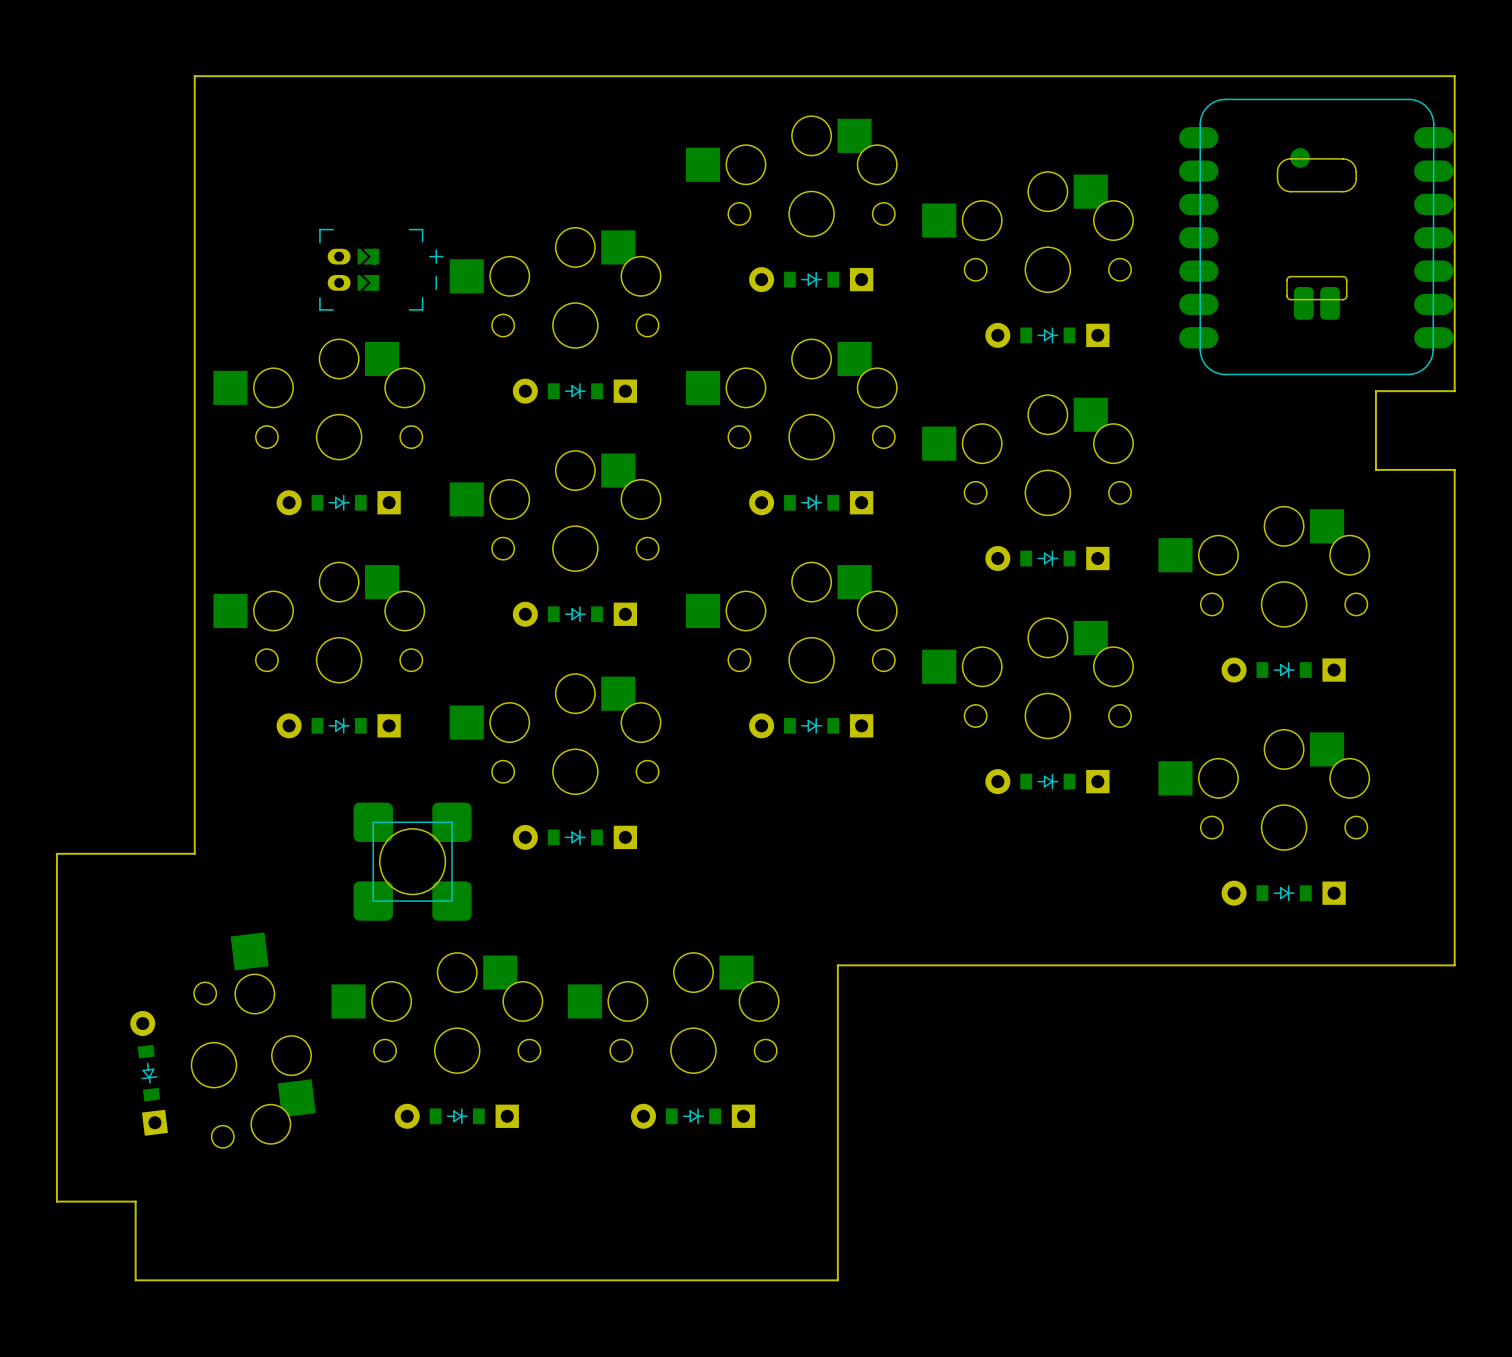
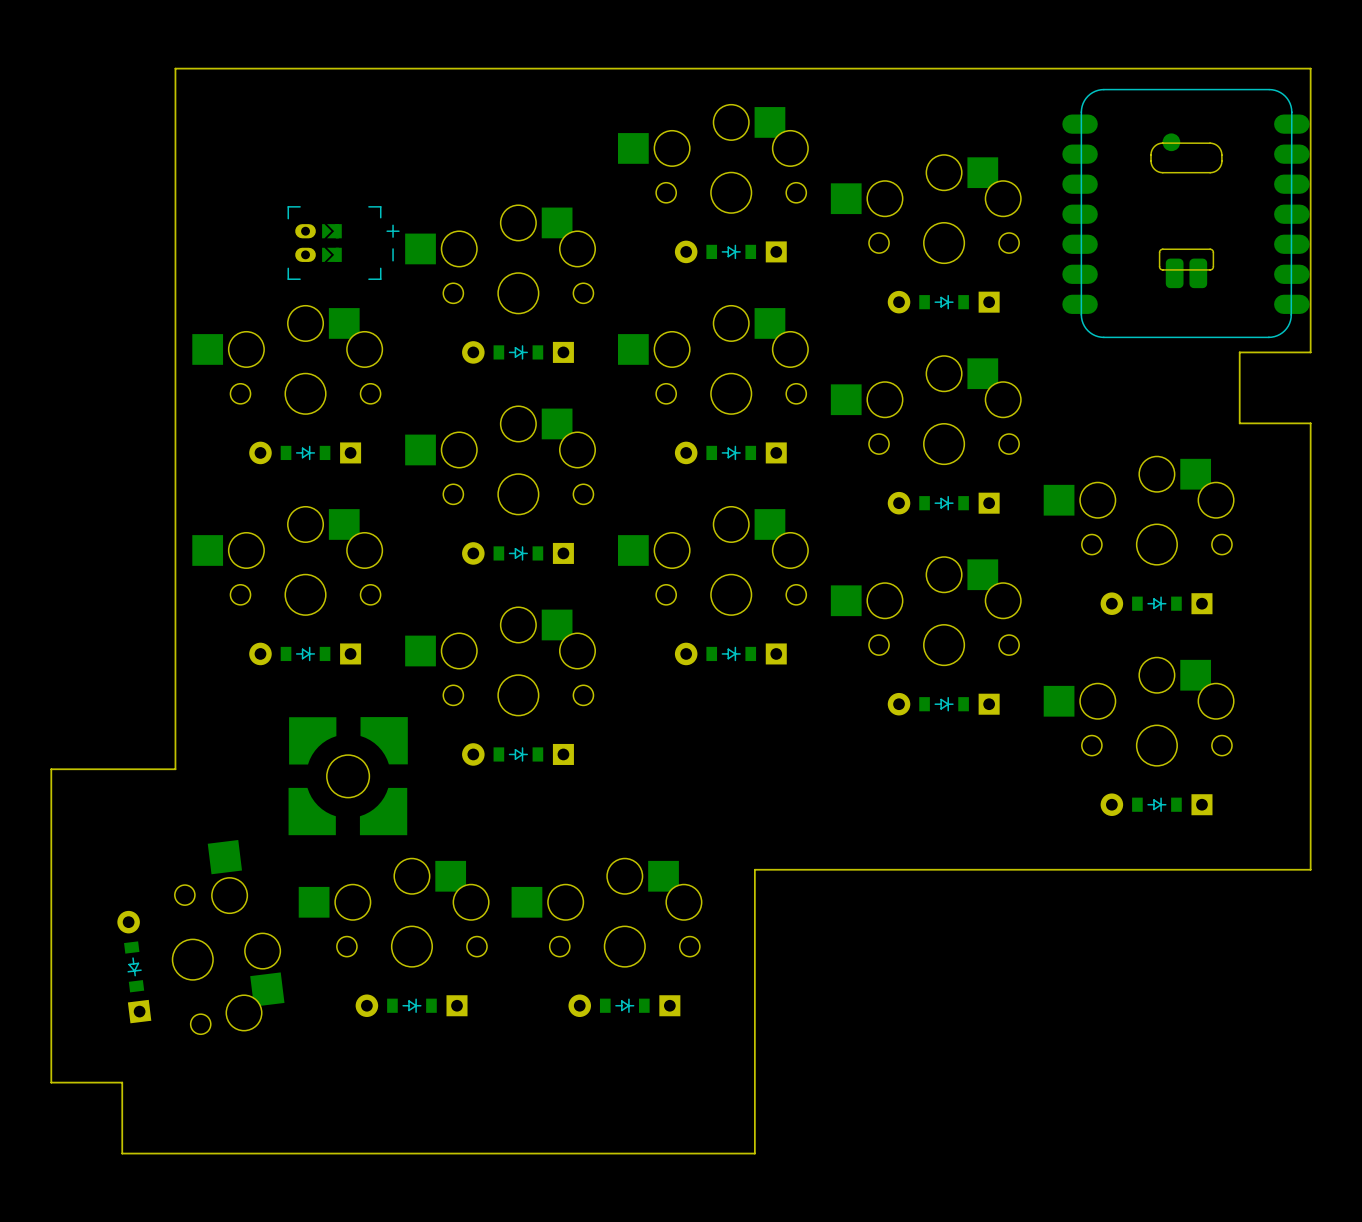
part: none -> (348, 776)
part: (412, 861) -> none

